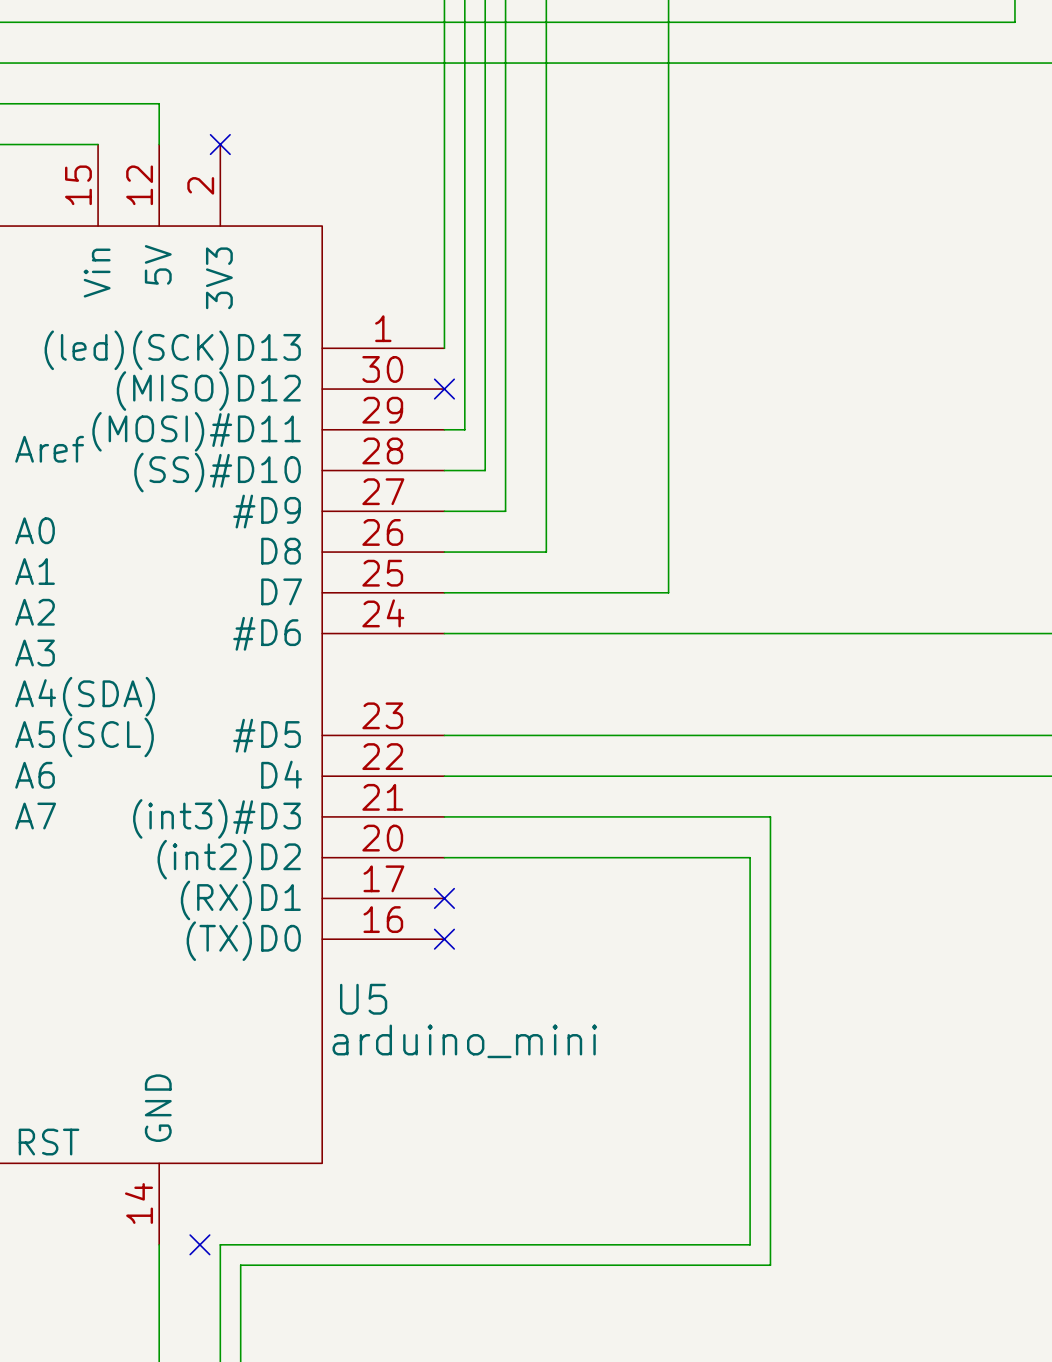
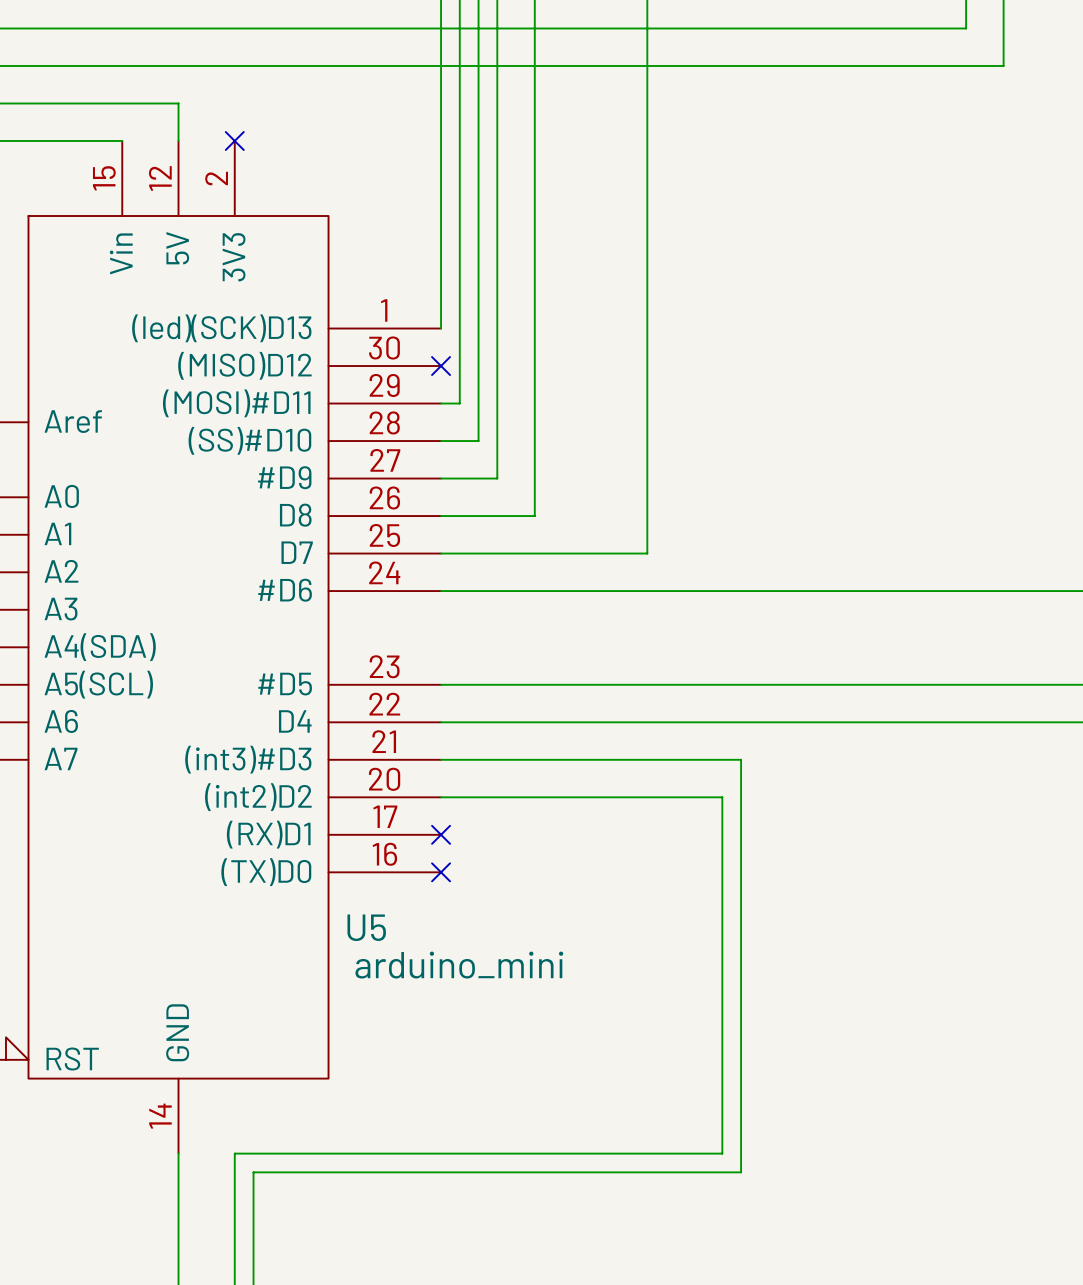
no-connect mark: (199, 1244) -> none

